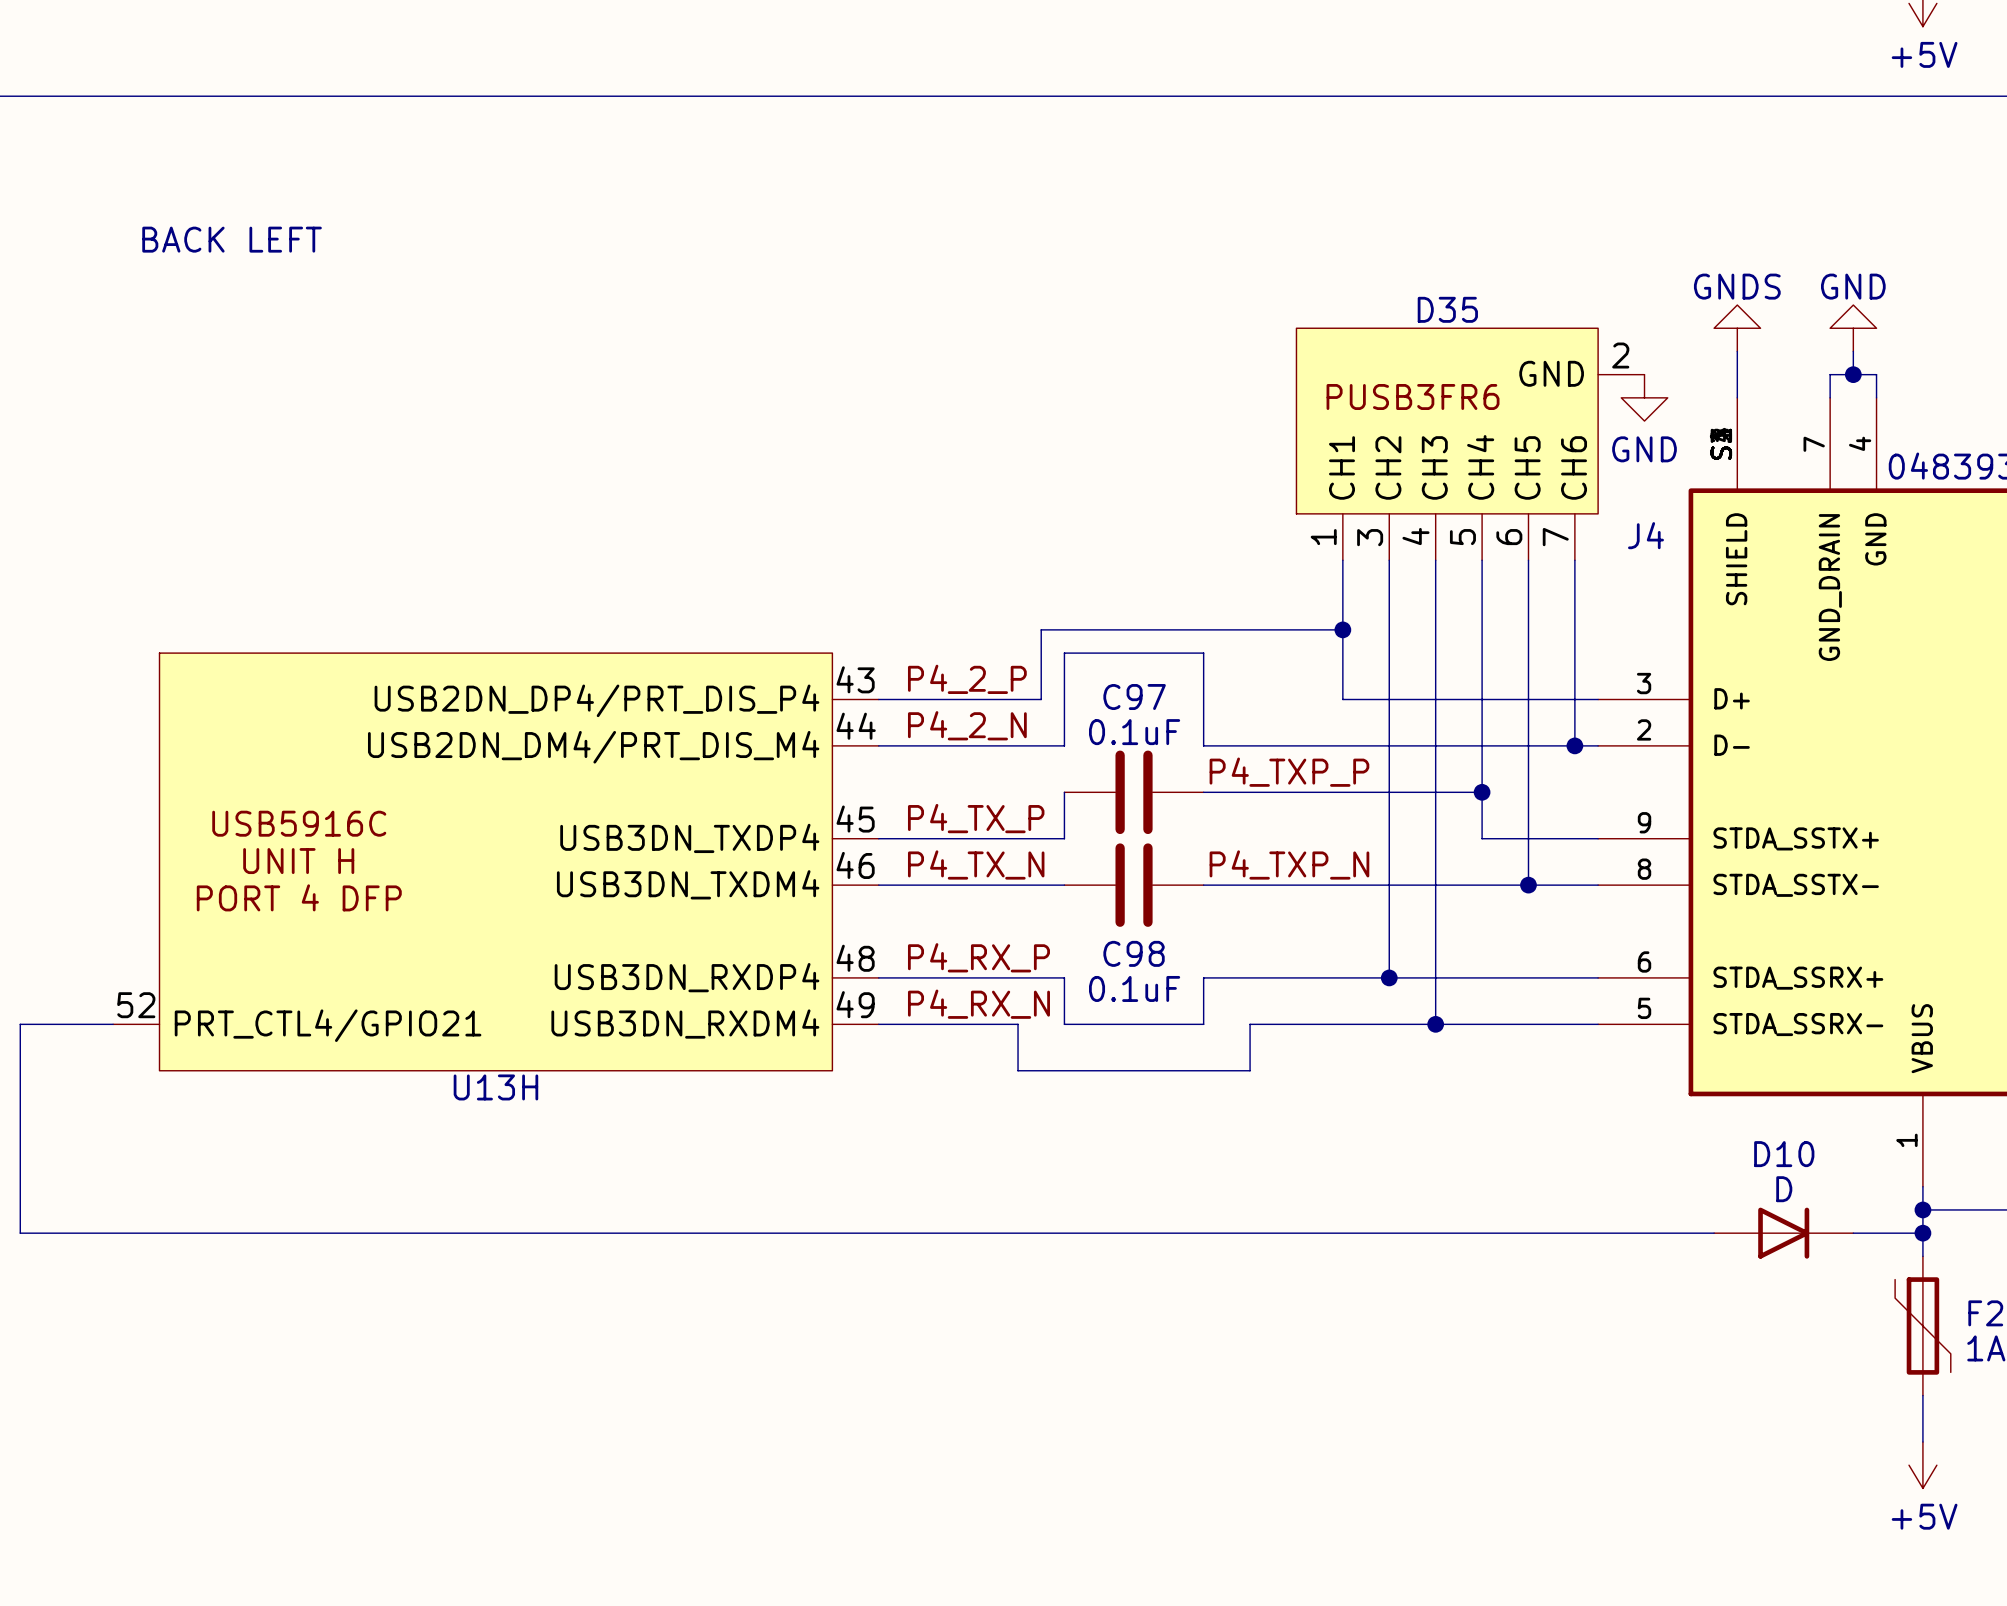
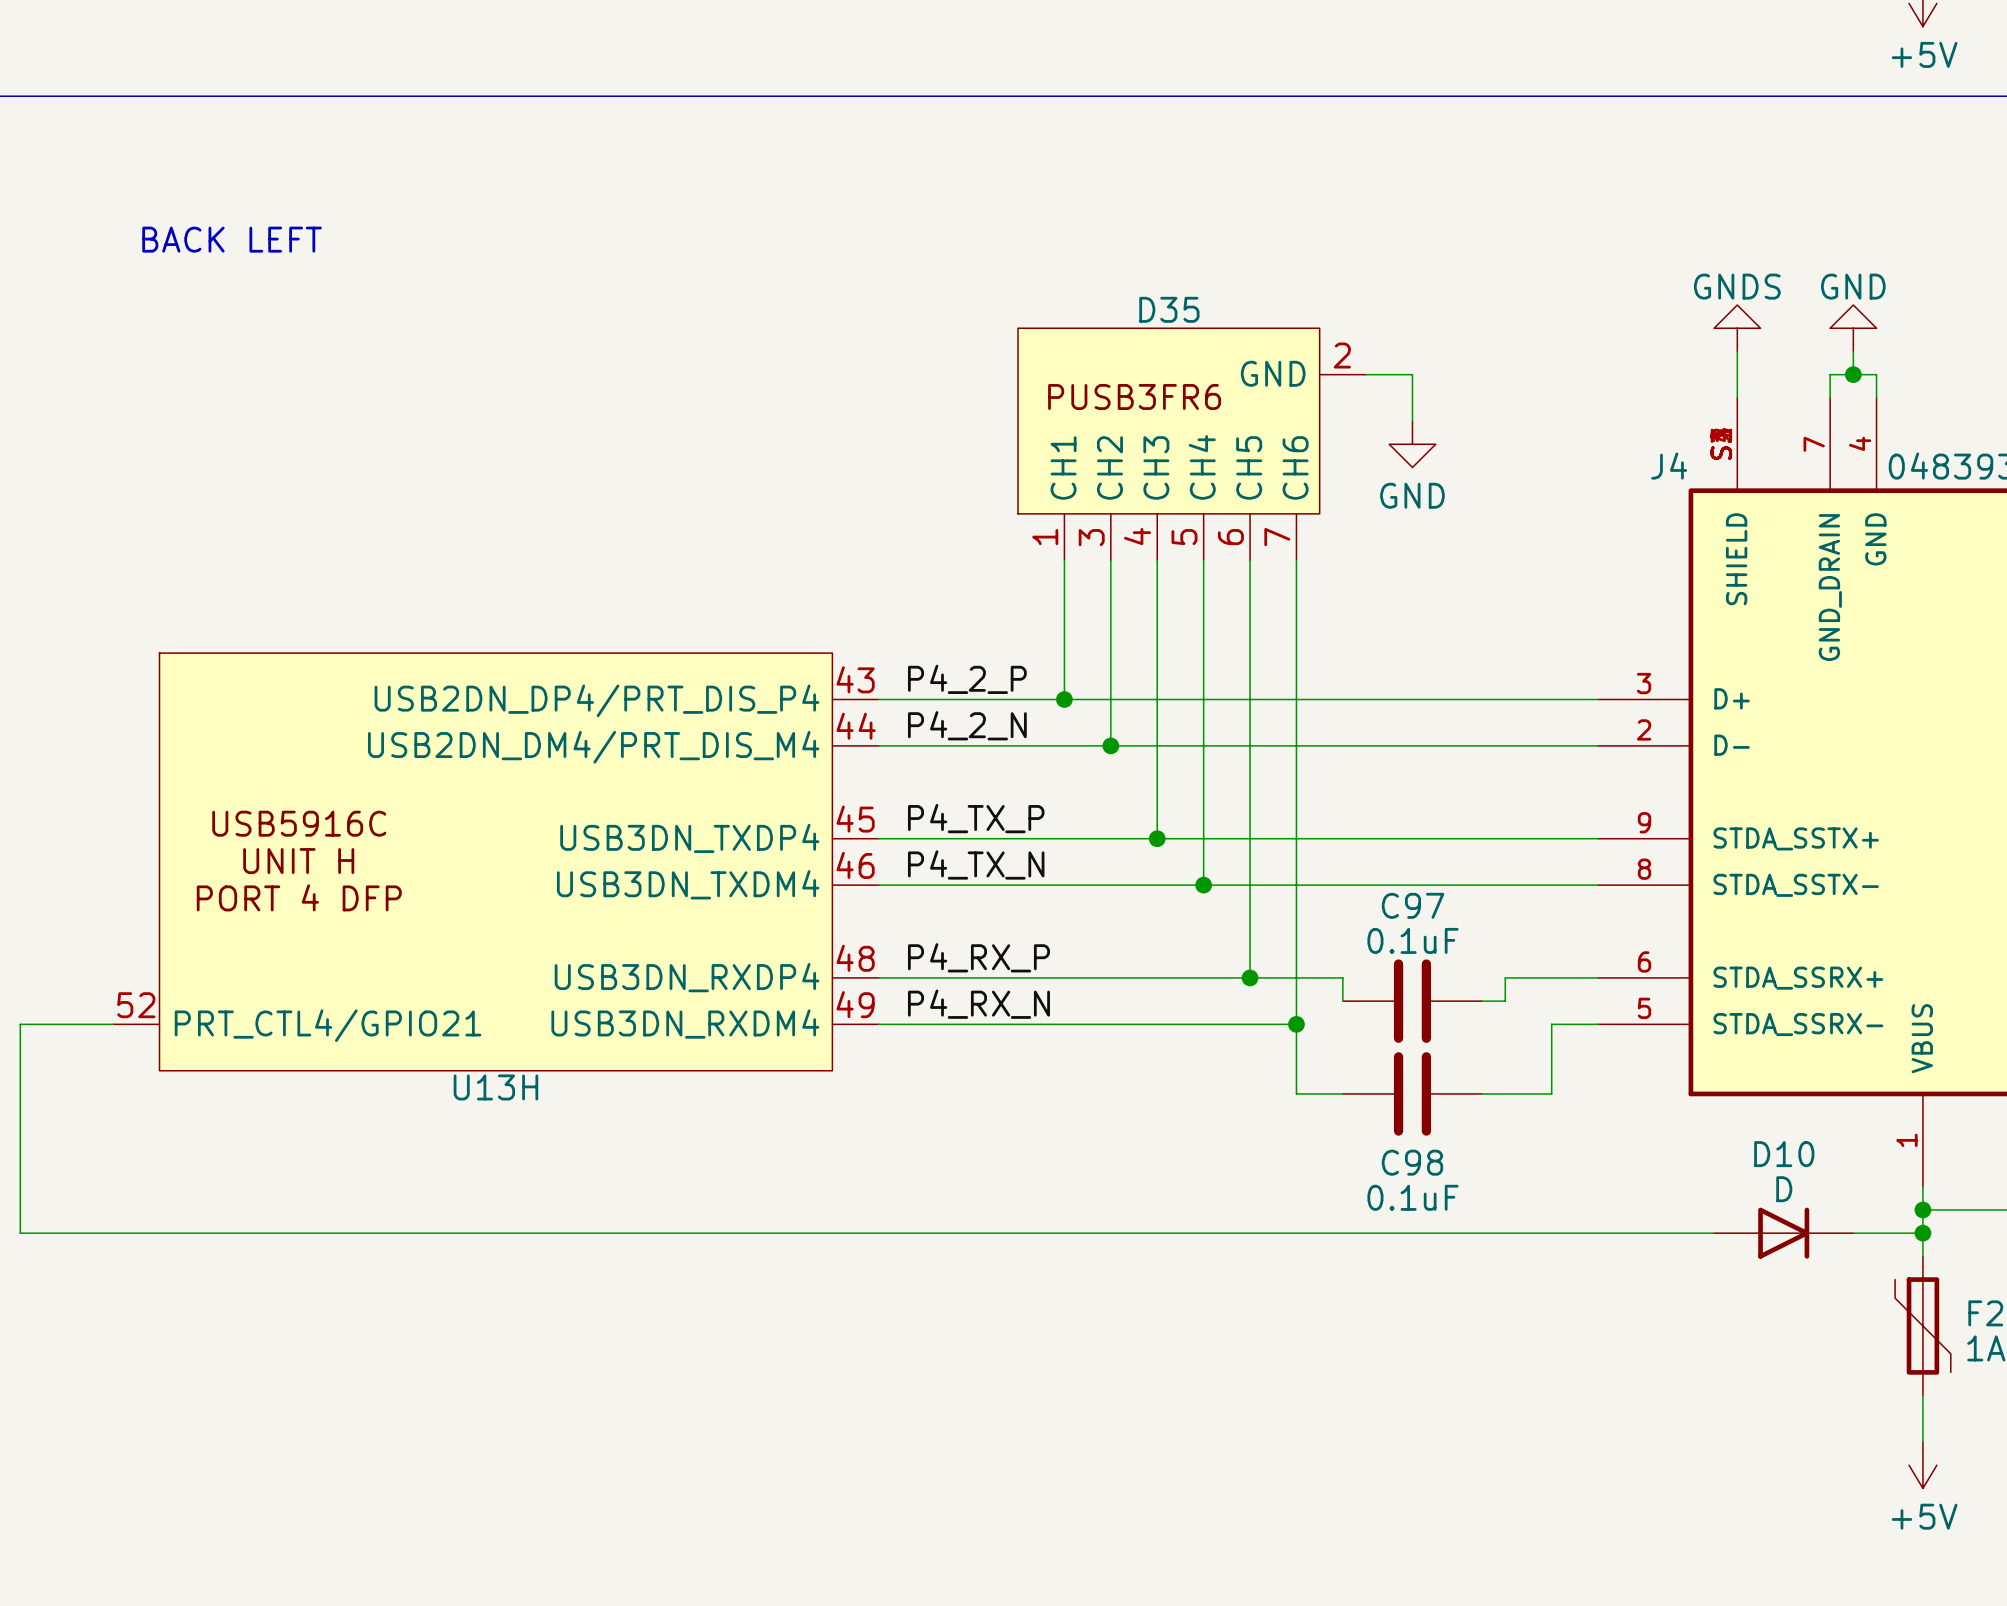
power symbol position: GND (1644, 397) -> GND (1412, 444)
D35 position: (1470, 444) -> (1192, 444)
J4 name position: J4 (1645, 535) -> J4 (1669, 466)
wire: none -> (1110, 560) (1110, 745)
wire: none -> (1203, 560) (1203, 653)
wire: none -> (1296, 560) (1296, 1093) (1342, 1093)
wire: (1342, 560) (1342, 699) -> none
wire: (1389, 560) (1389, 977) -> (1250, 560) (1250, 977)
wire: (1435, 560) (1435, 1024) -> none
wire: (1482, 560) (1482, 838) -> (1157, 560) (1157, 838)
wire: (1528, 560) (1528, 885) -> none
wire: (1574, 560) (1574, 745) -> none
wire: (1342, 629) (1041, 629) (1041, 699) -> (1342, 699) (1041, 699)
junction: (1342, 629) -> none
wire: (1064, 653) (1203, 653) -> (1064, 653) (1064, 560)
wire: (1064, 699) (1064, 745) -> (1064, 885) (1203, 885) (1203, 745) (1064, 745)
junction: none -> (1064, 699)
junction: none -> (1110, 745)
junction: (1574, 745) -> none
label: P4_TXP_P (1289, 772) -> none
wire: (1064, 792) (1064, 838) -> (1482, 838) (1064, 838)
C97 position: (1134, 792) -> (1412, 1001)
wire: (1203, 792) (1482, 792) -> none
junction: (1482, 792) -> none
junction: none -> (1157, 838)
label: P4_TXP_N (1289, 864) -> none
C98 position: (1134, 885) -> (1412, 1093)
junction: none -> (1203, 885)
junction: (1528, 885) -> none
wire: (1064, 977) (1064, 1024) -> (1018, 1024) (1064, 1024)
wire: none -> (1064, 977) (1203, 977)
wire: (1203, 977) (1203, 1024) -> (1250, 1024) (1203, 1024)
junction: none -> (1250, 977)
wire: (1342, 977) (1505, 977) -> (1482, 1001) (1505, 1001) (1505, 977)
wire: none -> (1342, 977) (1342, 1001)
junction: (1389, 977) -> none
wire: (1018, 1024) (1018, 1070) (1250, 1070) (1250, 1024) -> none
wire: (1296, 1024) (1551, 1024) -> (1482, 1093) (1551, 1093) (1551, 1024)
junction: none -> (1296, 1024)
junction: (1435, 1024) -> none

